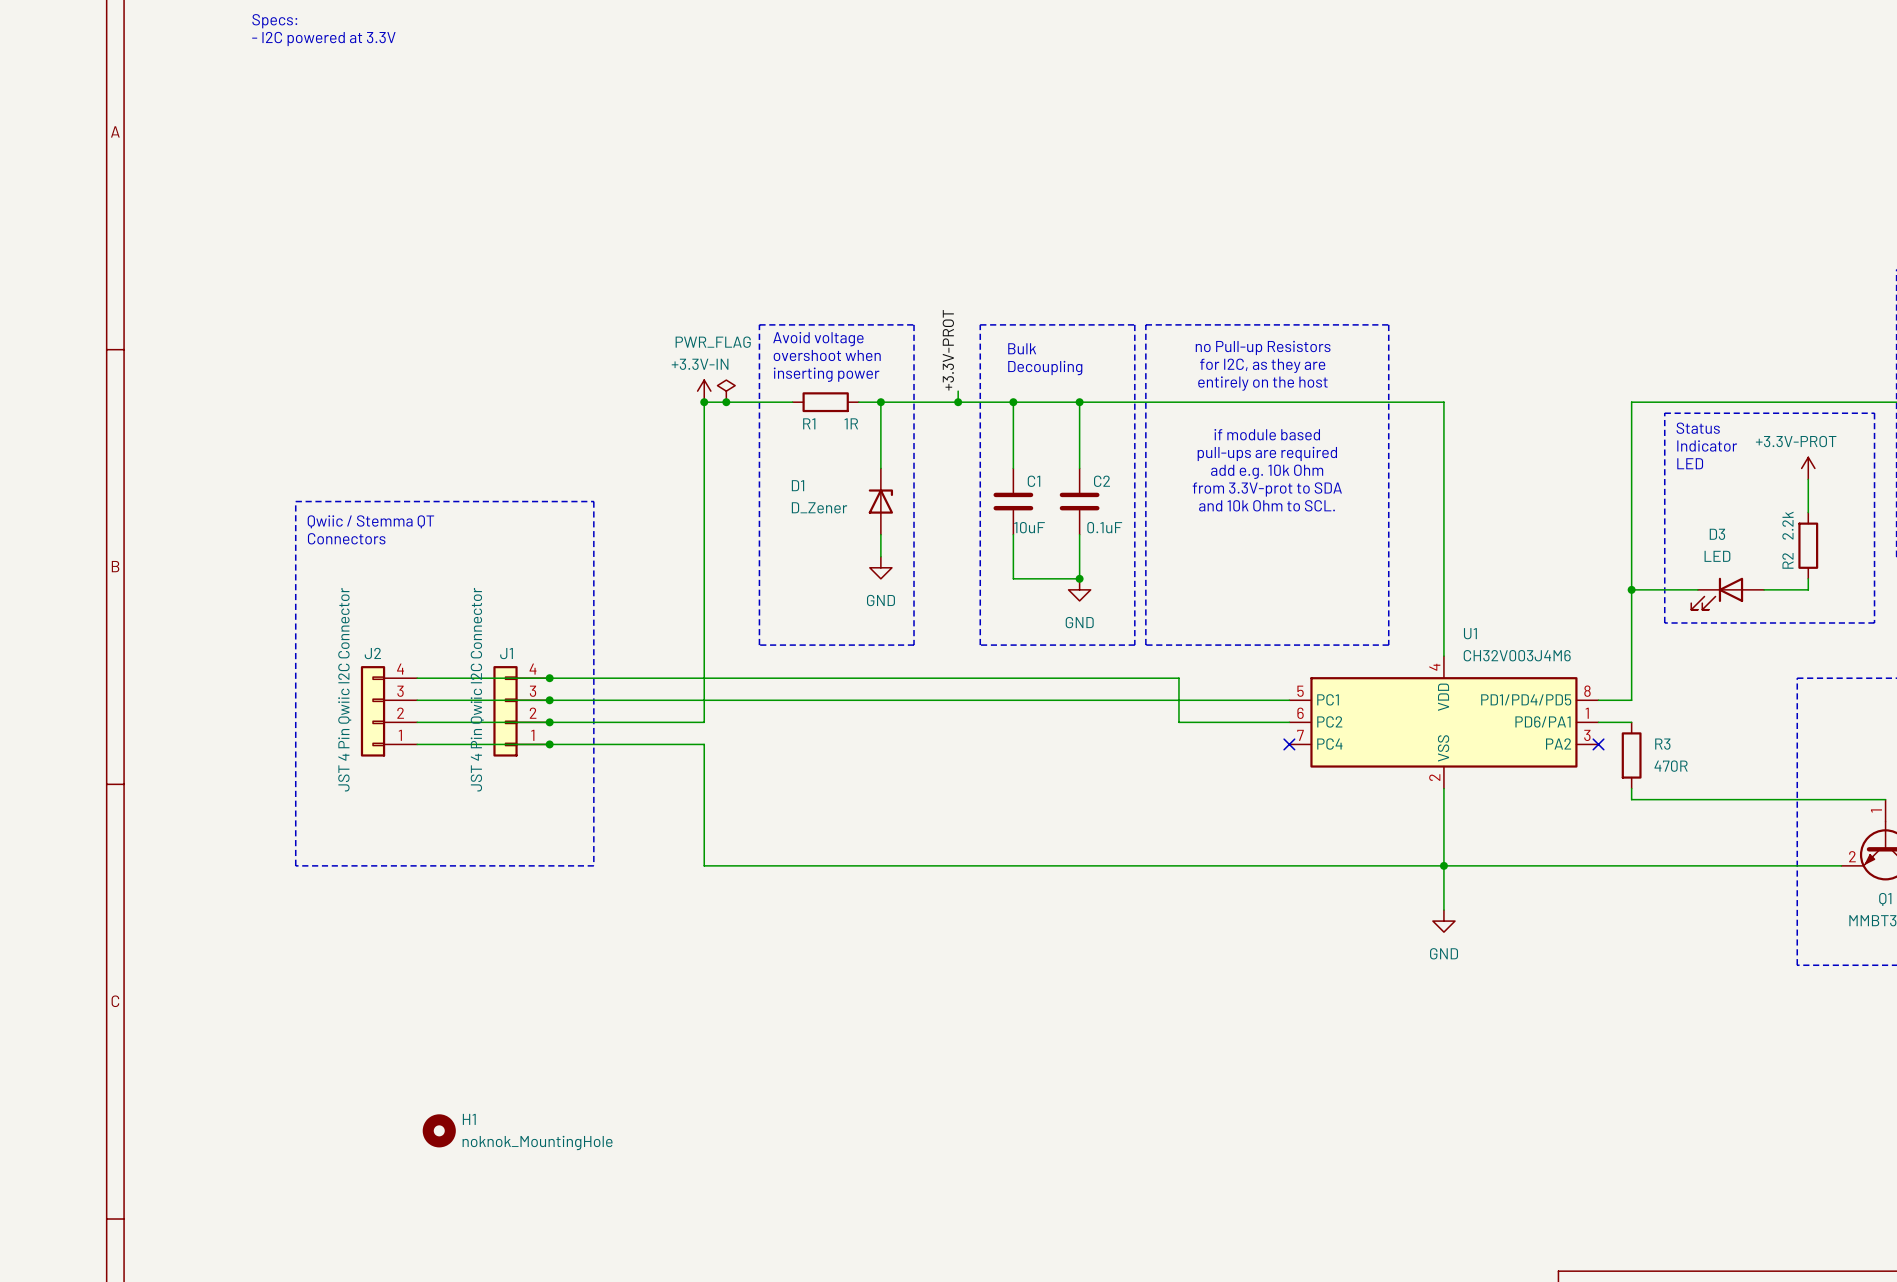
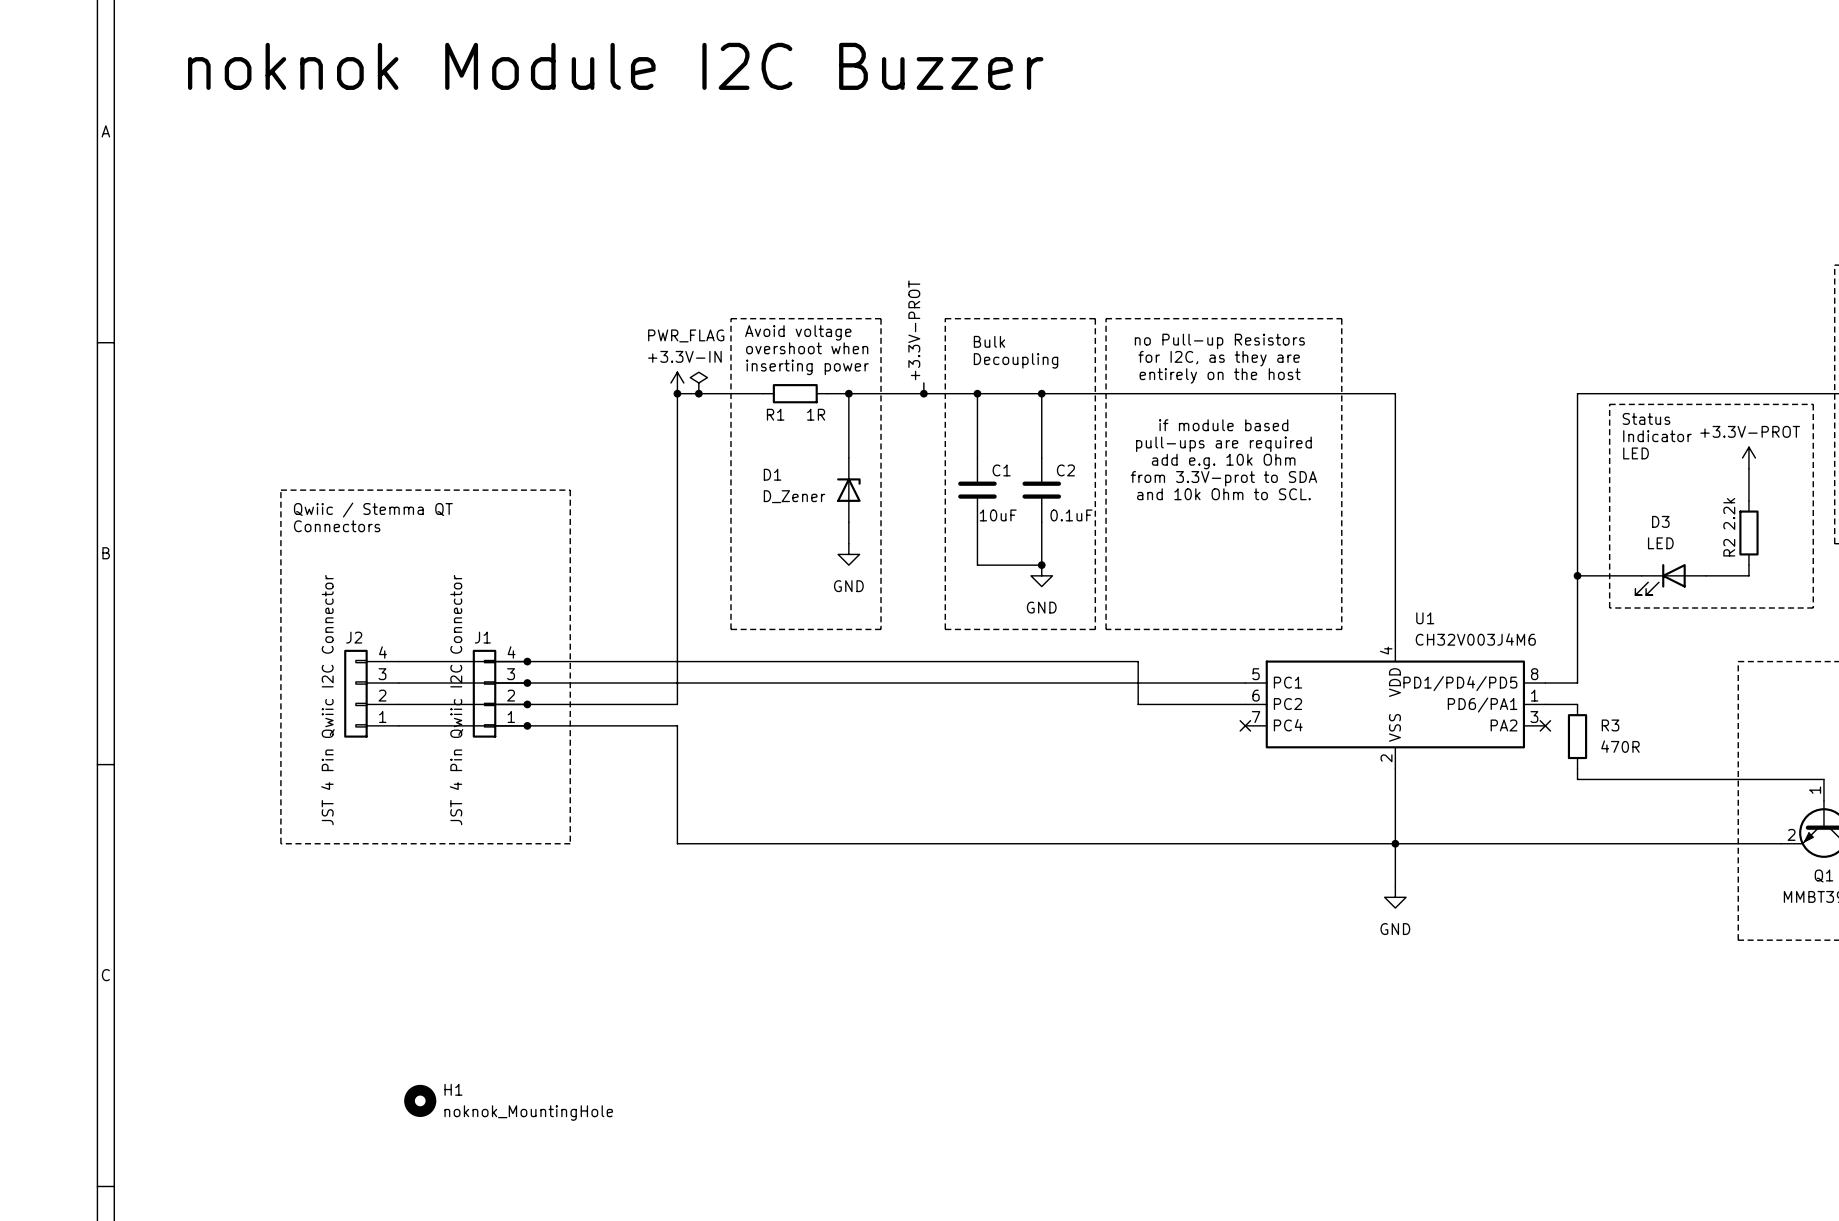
text: Specs: (274, 21) -> none
text: - I2C powered at 3.3V (323, 38) -> none
text: none -> noknok Module I2C Buzzer (615, 66)

